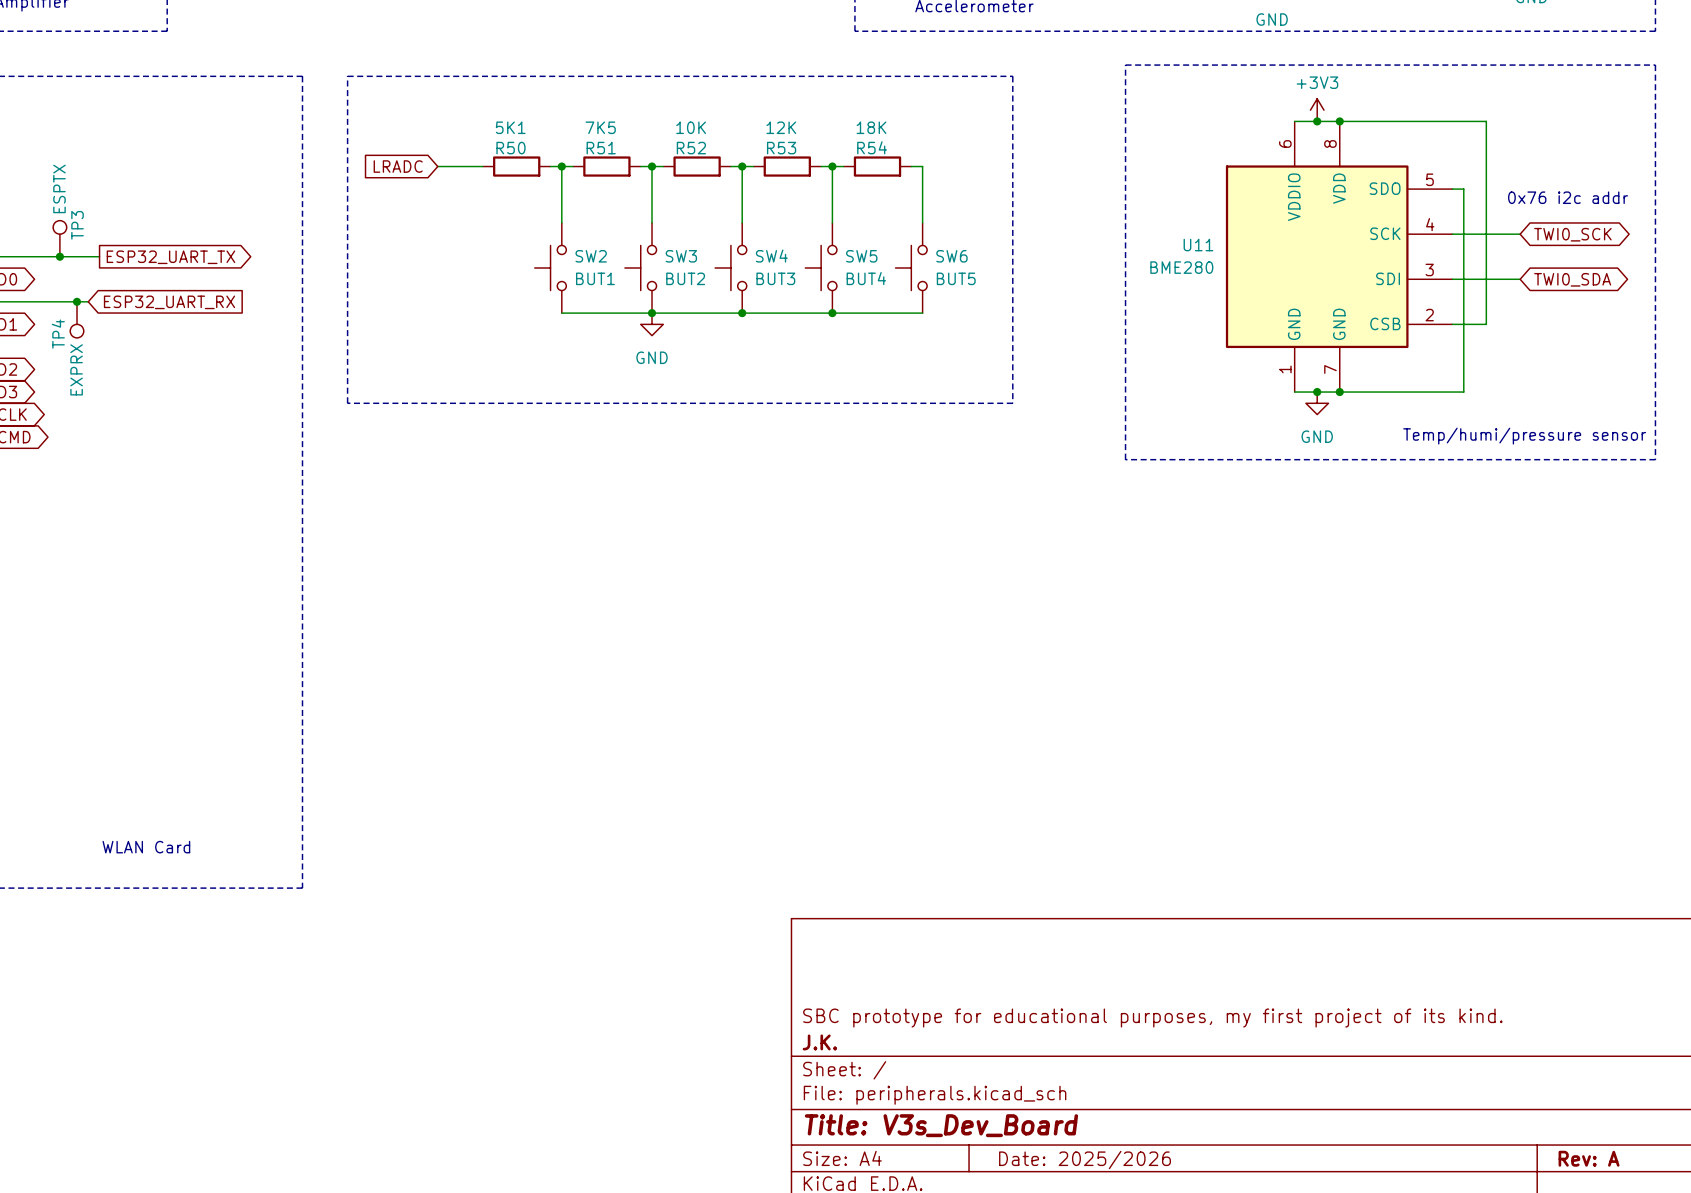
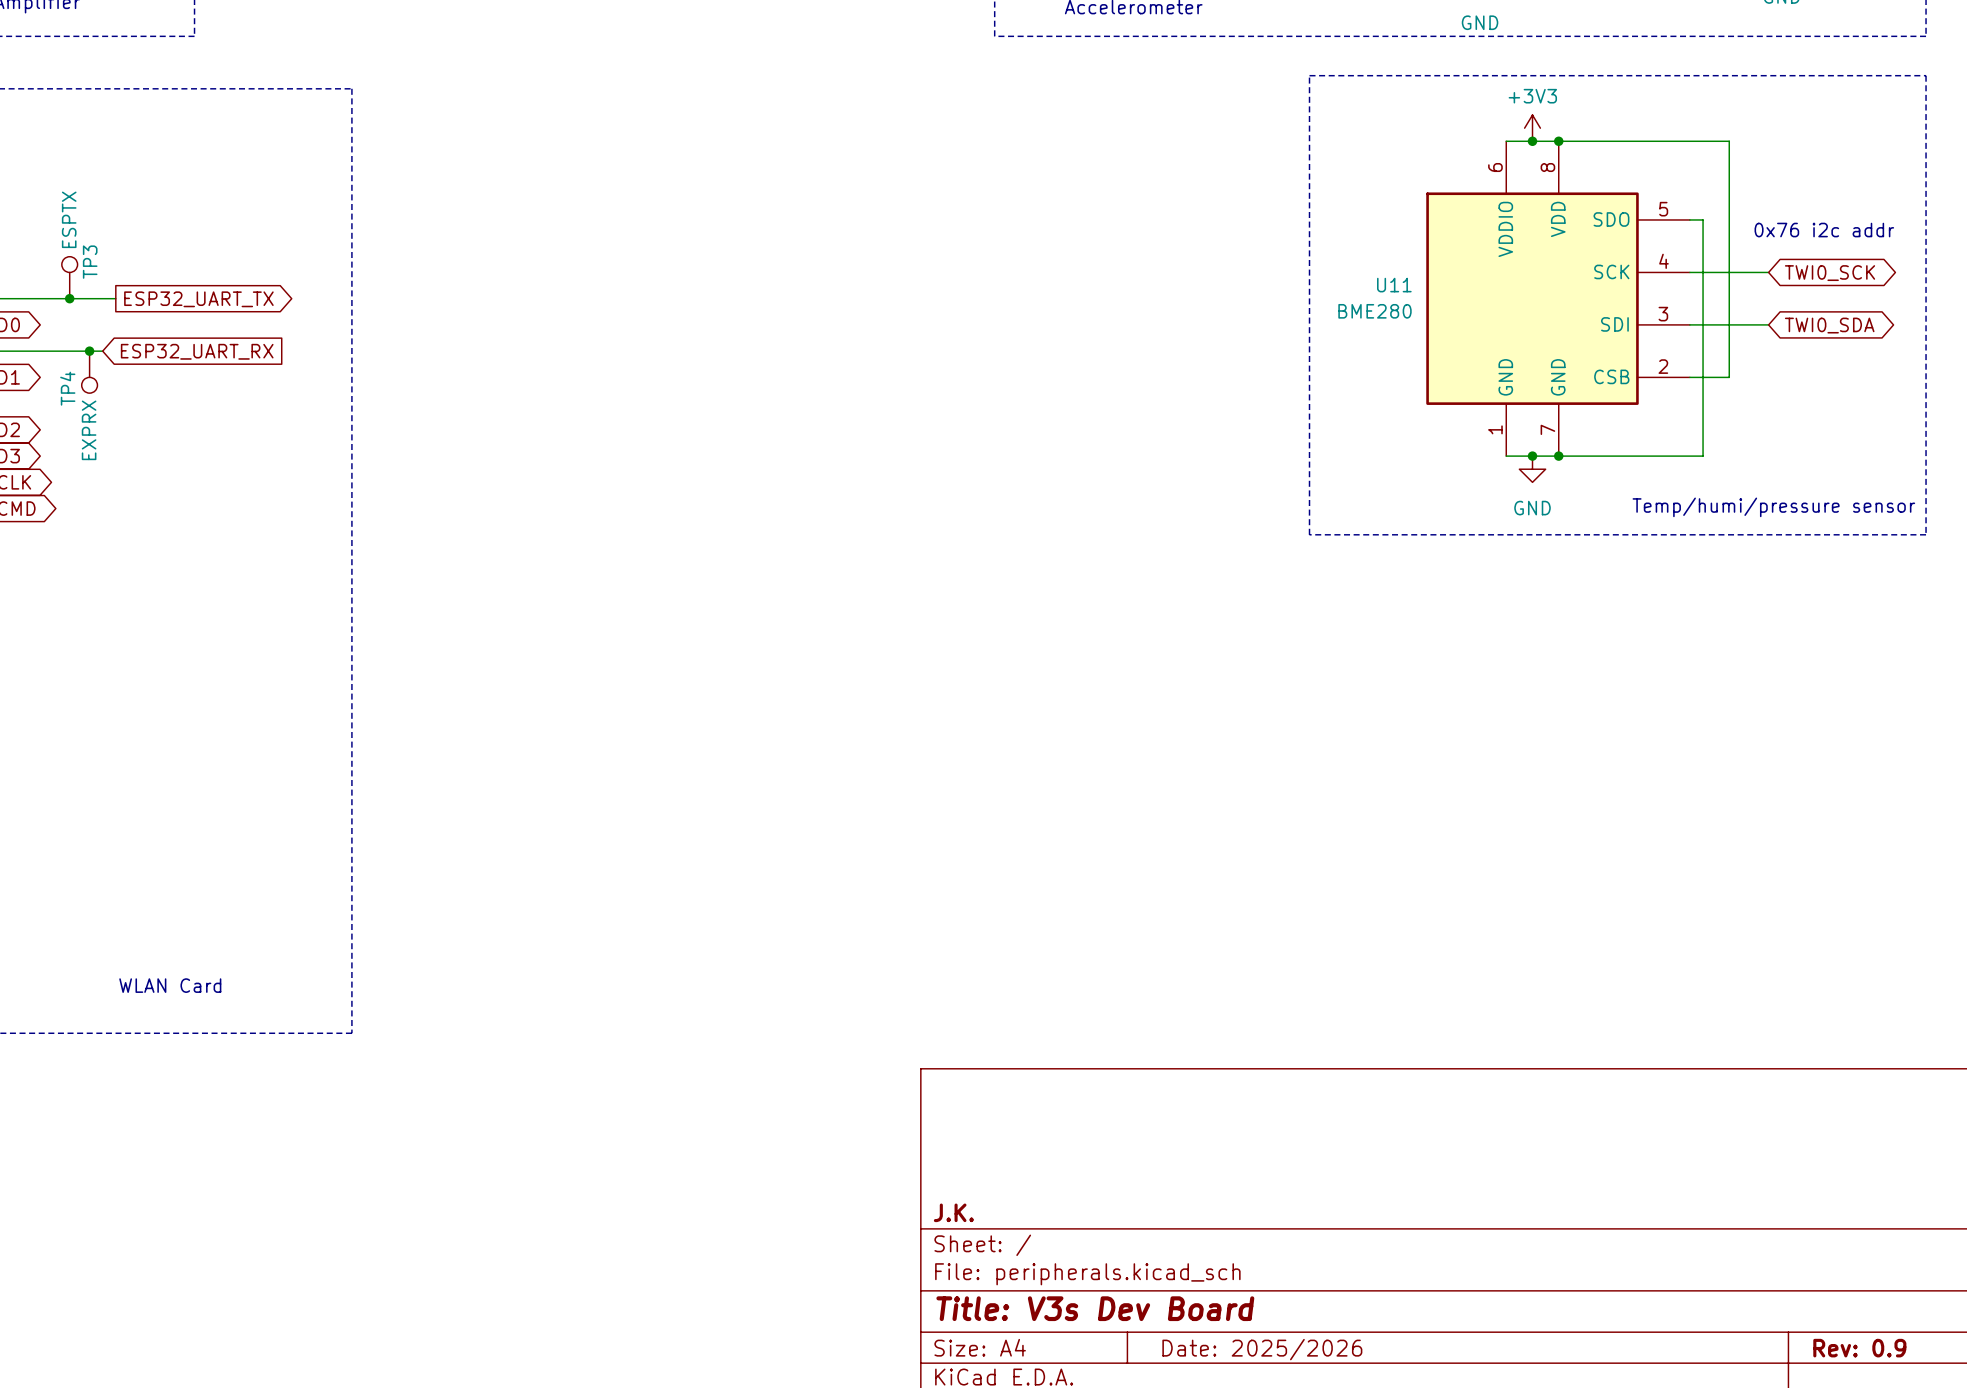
line: (347, 76) (1012, 76) (1012, 403) (347, 403) (347, 76) -> none
global label: LRADC (398, 166) -> none
wire: (437, 166) (482, 166) -> none
R50: 5K1 (516, 166) -> none
wire: (550, 166) (573, 166) -> none
wire: (561, 166) (561, 222) -> none
junction: (561, 166) -> none
R51: 7K5 (606, 166) -> none
wire: (640, 166) (663, 166) -> none
wire: (652, 166) (652, 222) -> none
junction: (652, 166) -> none
R52: 10K (697, 166) -> none
wire: (730, 166) (753, 166) -> none
wire: (742, 166) (742, 222) -> none
junction: (742, 166) -> none
R53: 12K (787, 166) -> none
wire: (821, 166) (843, 166) -> none
wire: (832, 166) (832, 222) -> none
junction: (832, 166) -> none
R54: 18K (877, 166) -> none
wire: (911, 166) (922, 166) (922, 222) -> none
SW2: BUT1 (550, 268) -> none
SW3: BUT2 (640, 268) -> none
SW4: BUT3 (730, 268) -> none
SW5: BUT4 (821, 268) -> none
SW6: BUT5 (911, 268) -> none
wire: (561, 313) (922, 313) -> none
junction: (652, 313) -> none
junction: (742, 313) -> none
junction: (832, 313) -> none
power symbol: GND (652, 324) -> none
title block: SBC prototype for educational purposes, my first project of its kind. (1152, 1018) -> none
title block: Title: V3s_Dev_Board (941, 1125) -> Title: V3s Dev Board (1095, 1308)
title block: Rev: A (1589, 1158) -> Rev: 0.9 (1859, 1348)

